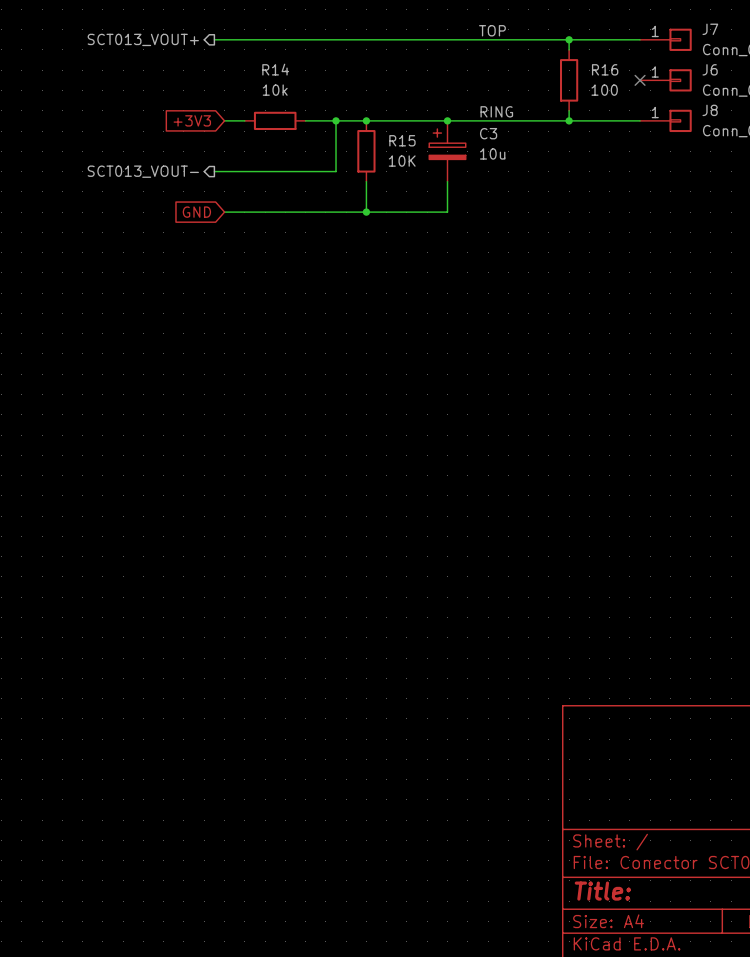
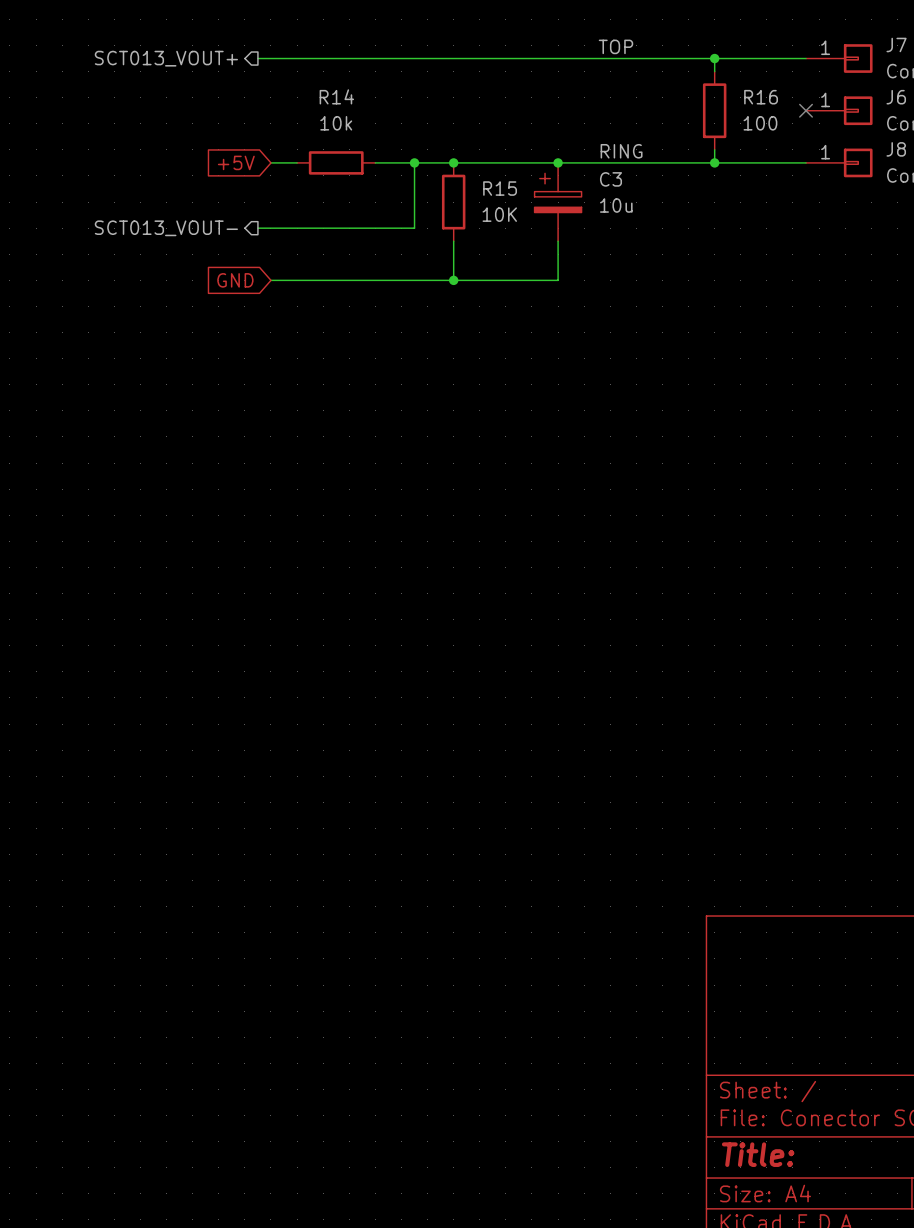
global label: +3V3 (192, 120) -> +5V (236, 162)

